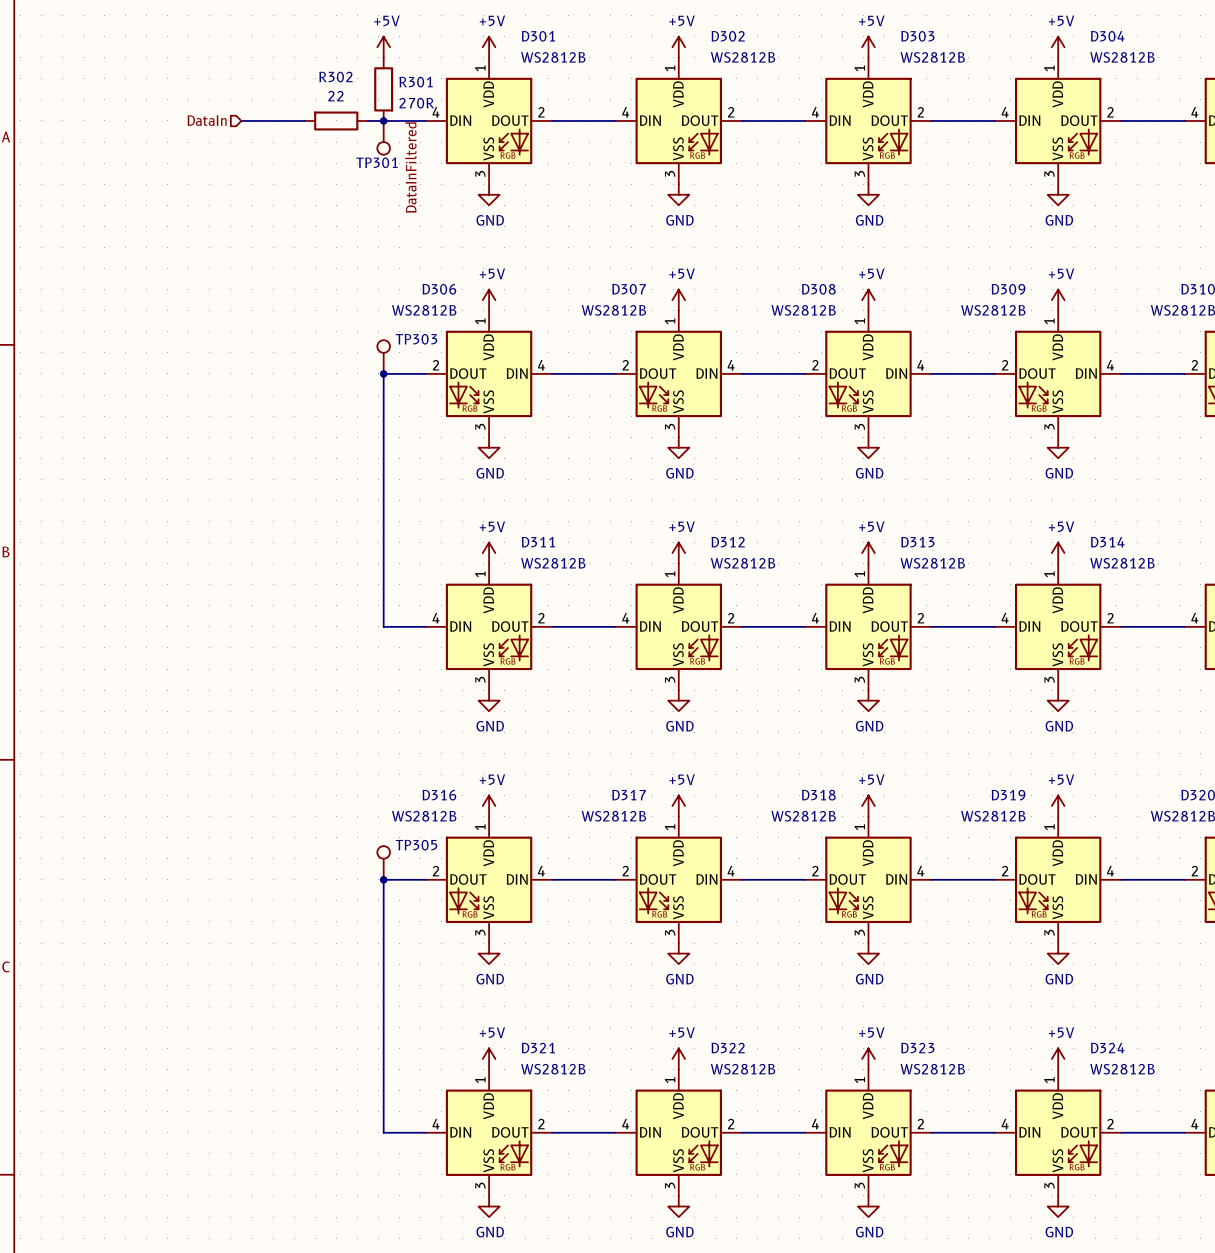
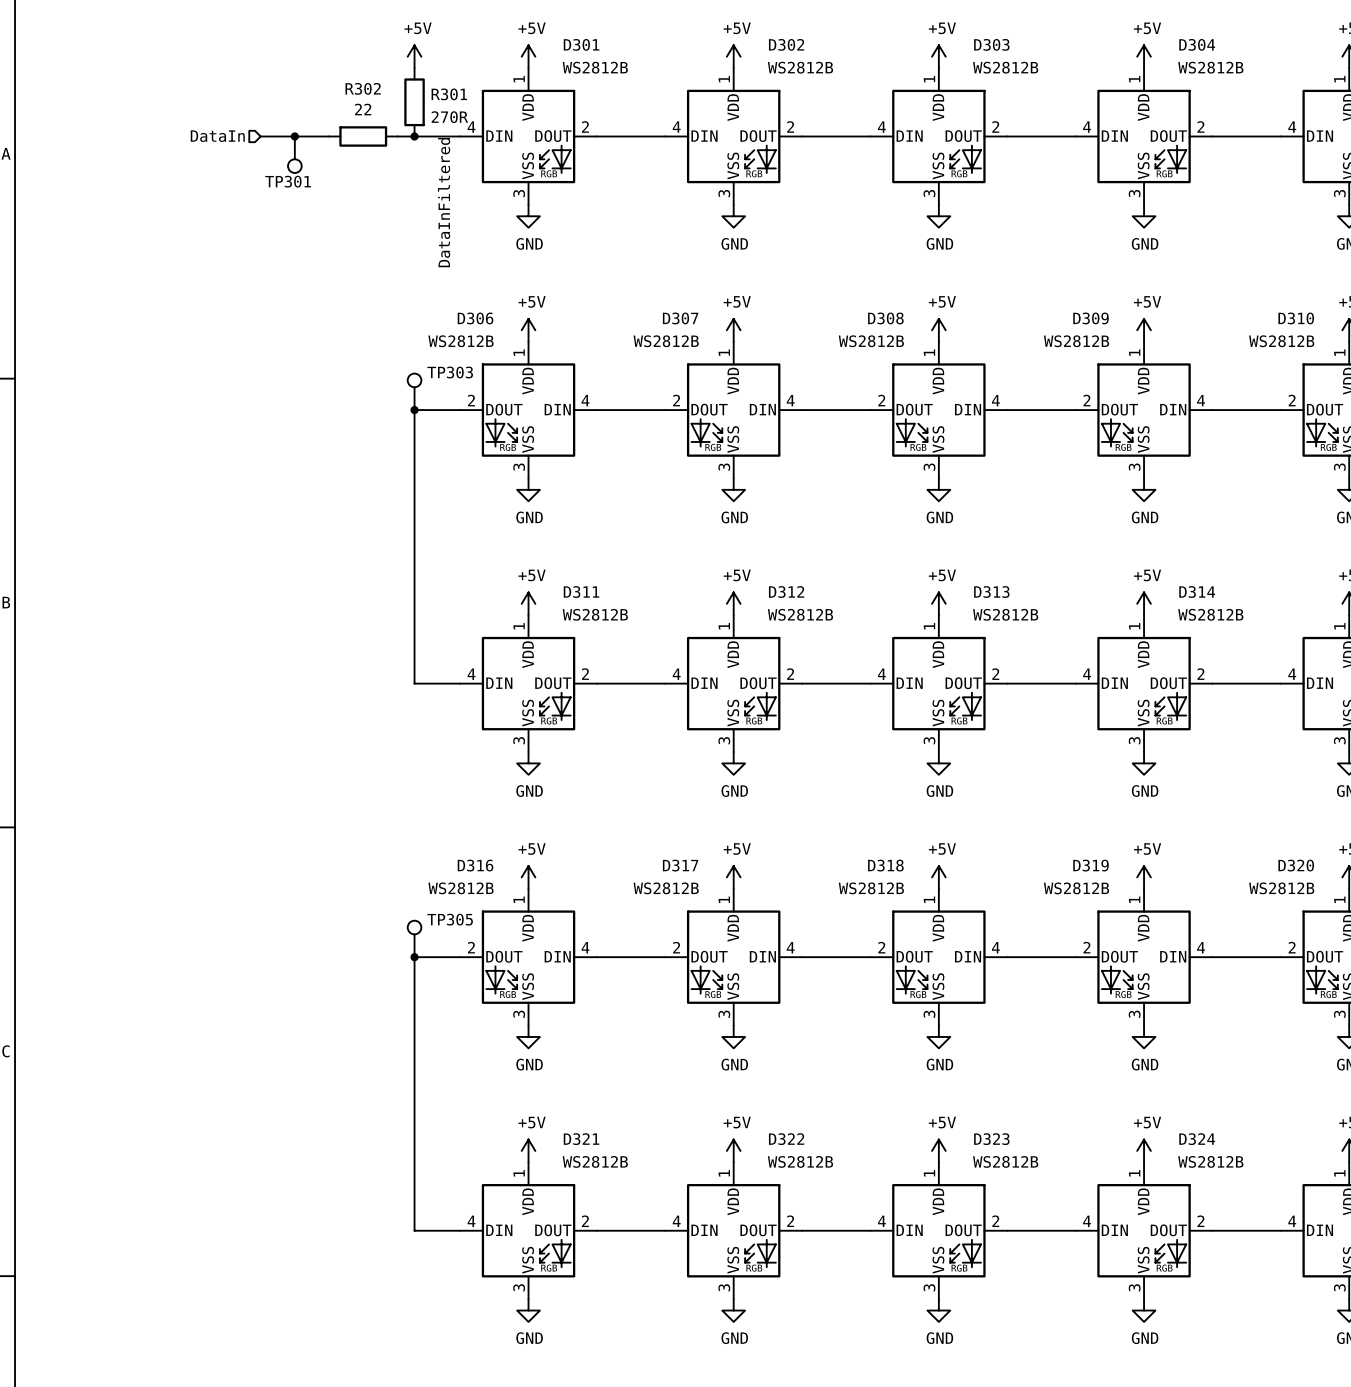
junction: none -> (294, 136)
TP301 position: (383, 137) -> (294, 154)

